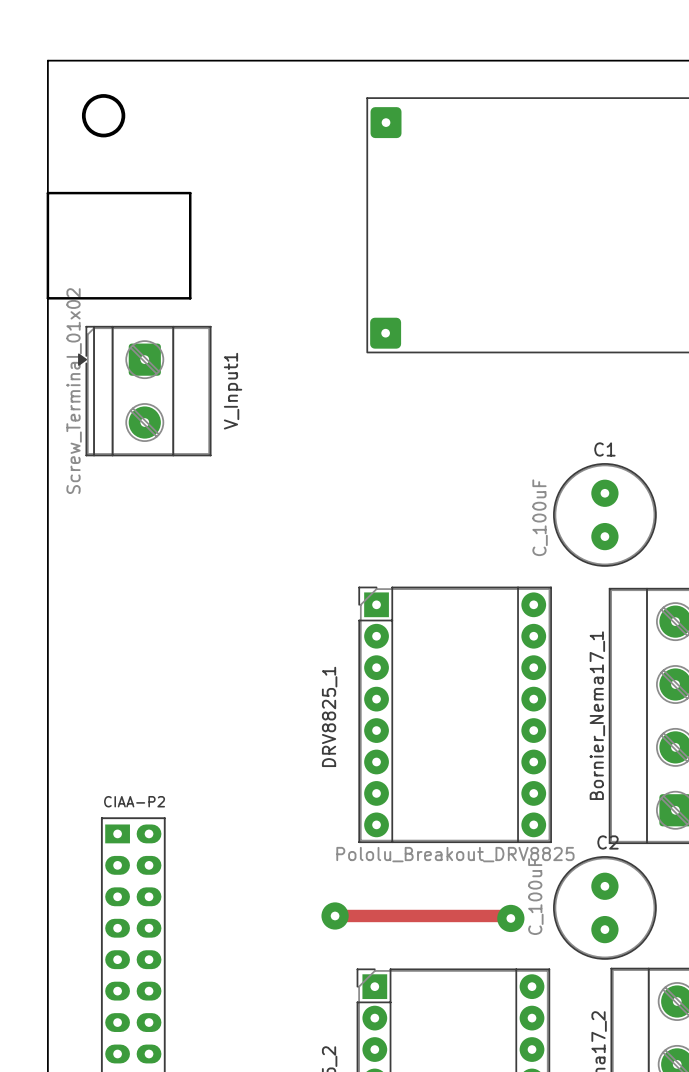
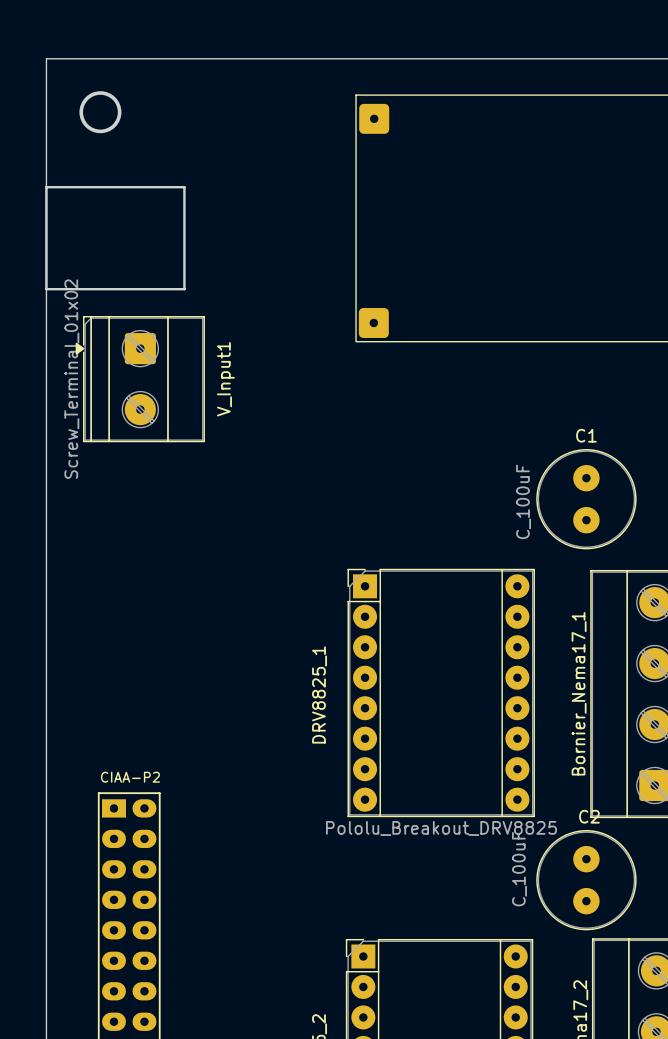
track: (335, 915) (508, 915) (510, 918) -> none
part: (335, 915) -> none
part: (510, 918) -> none

